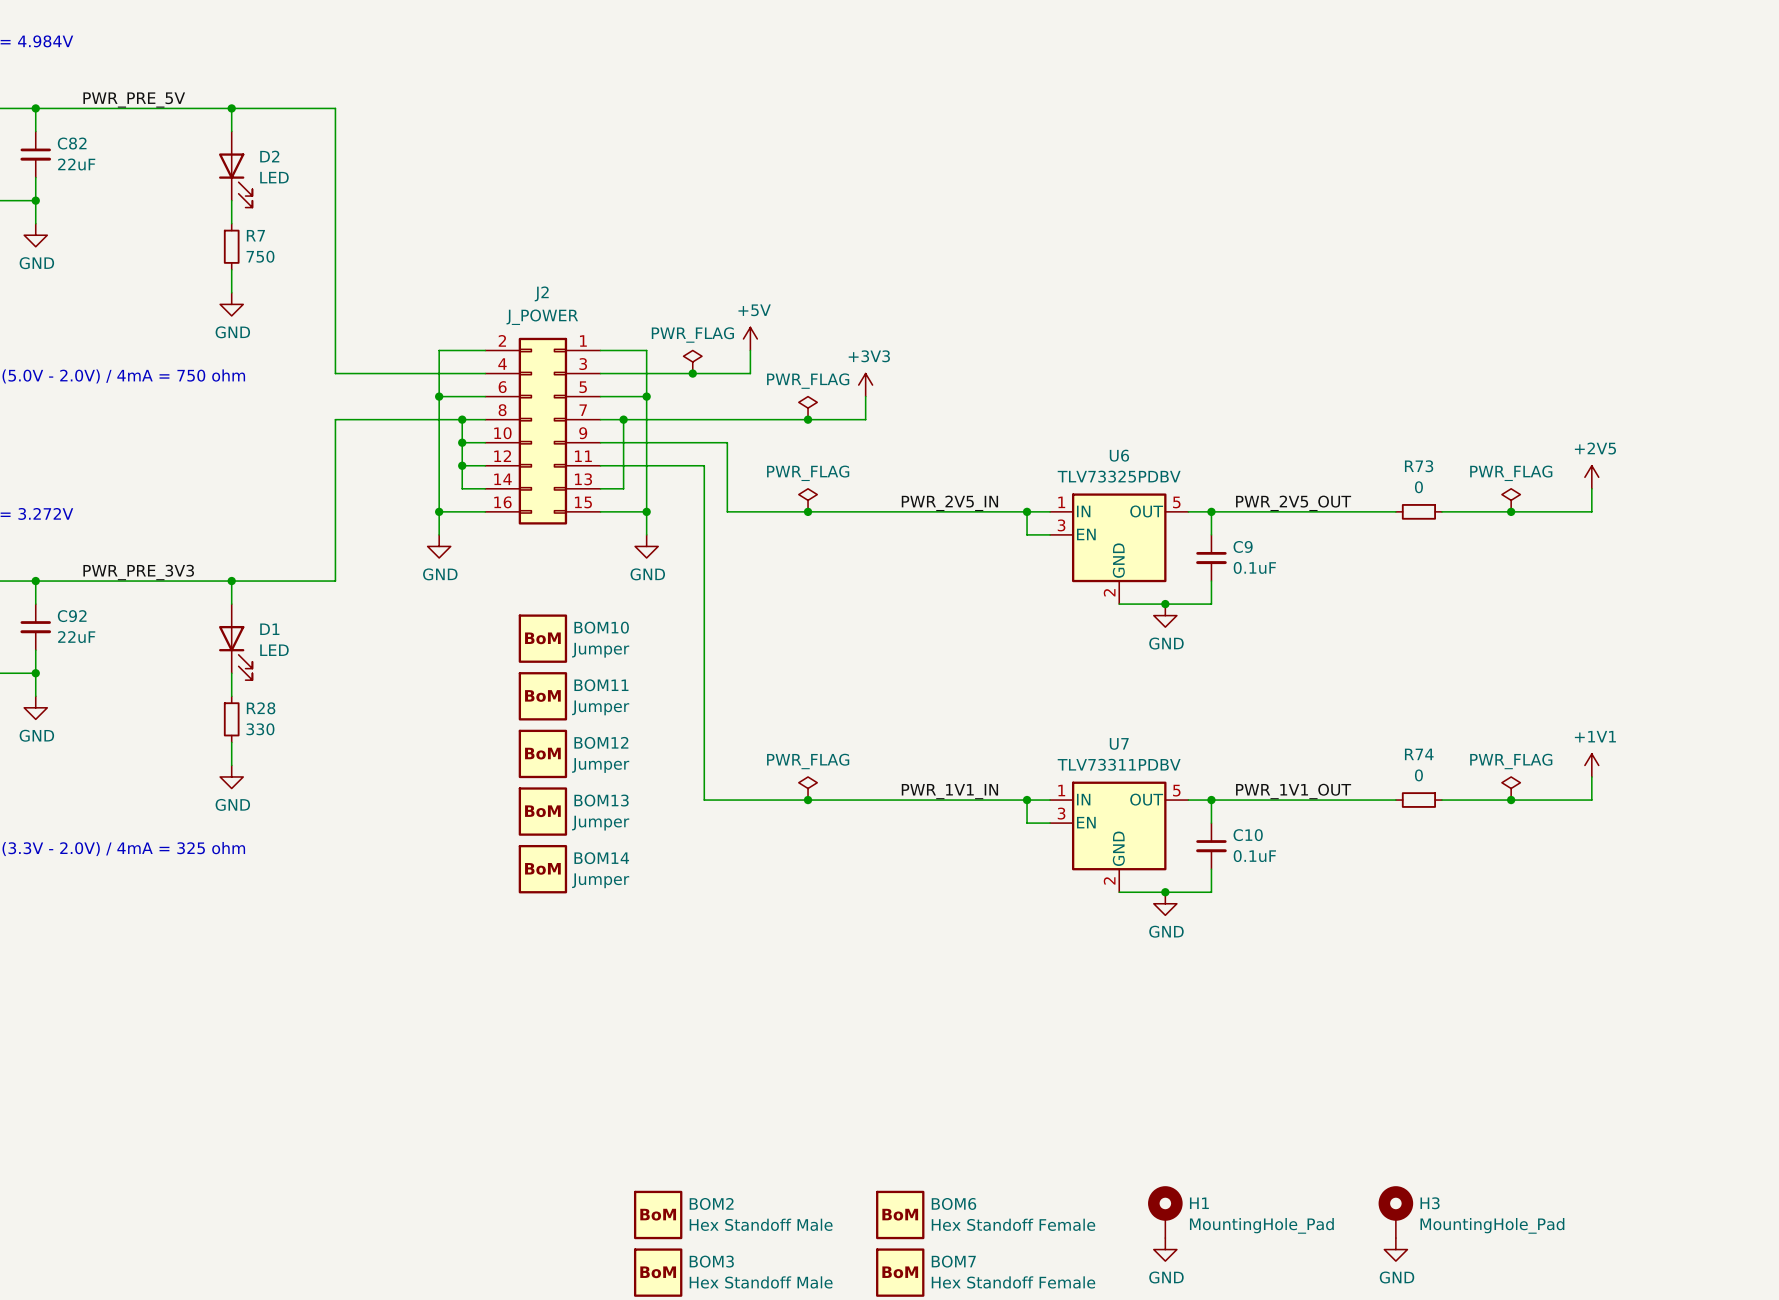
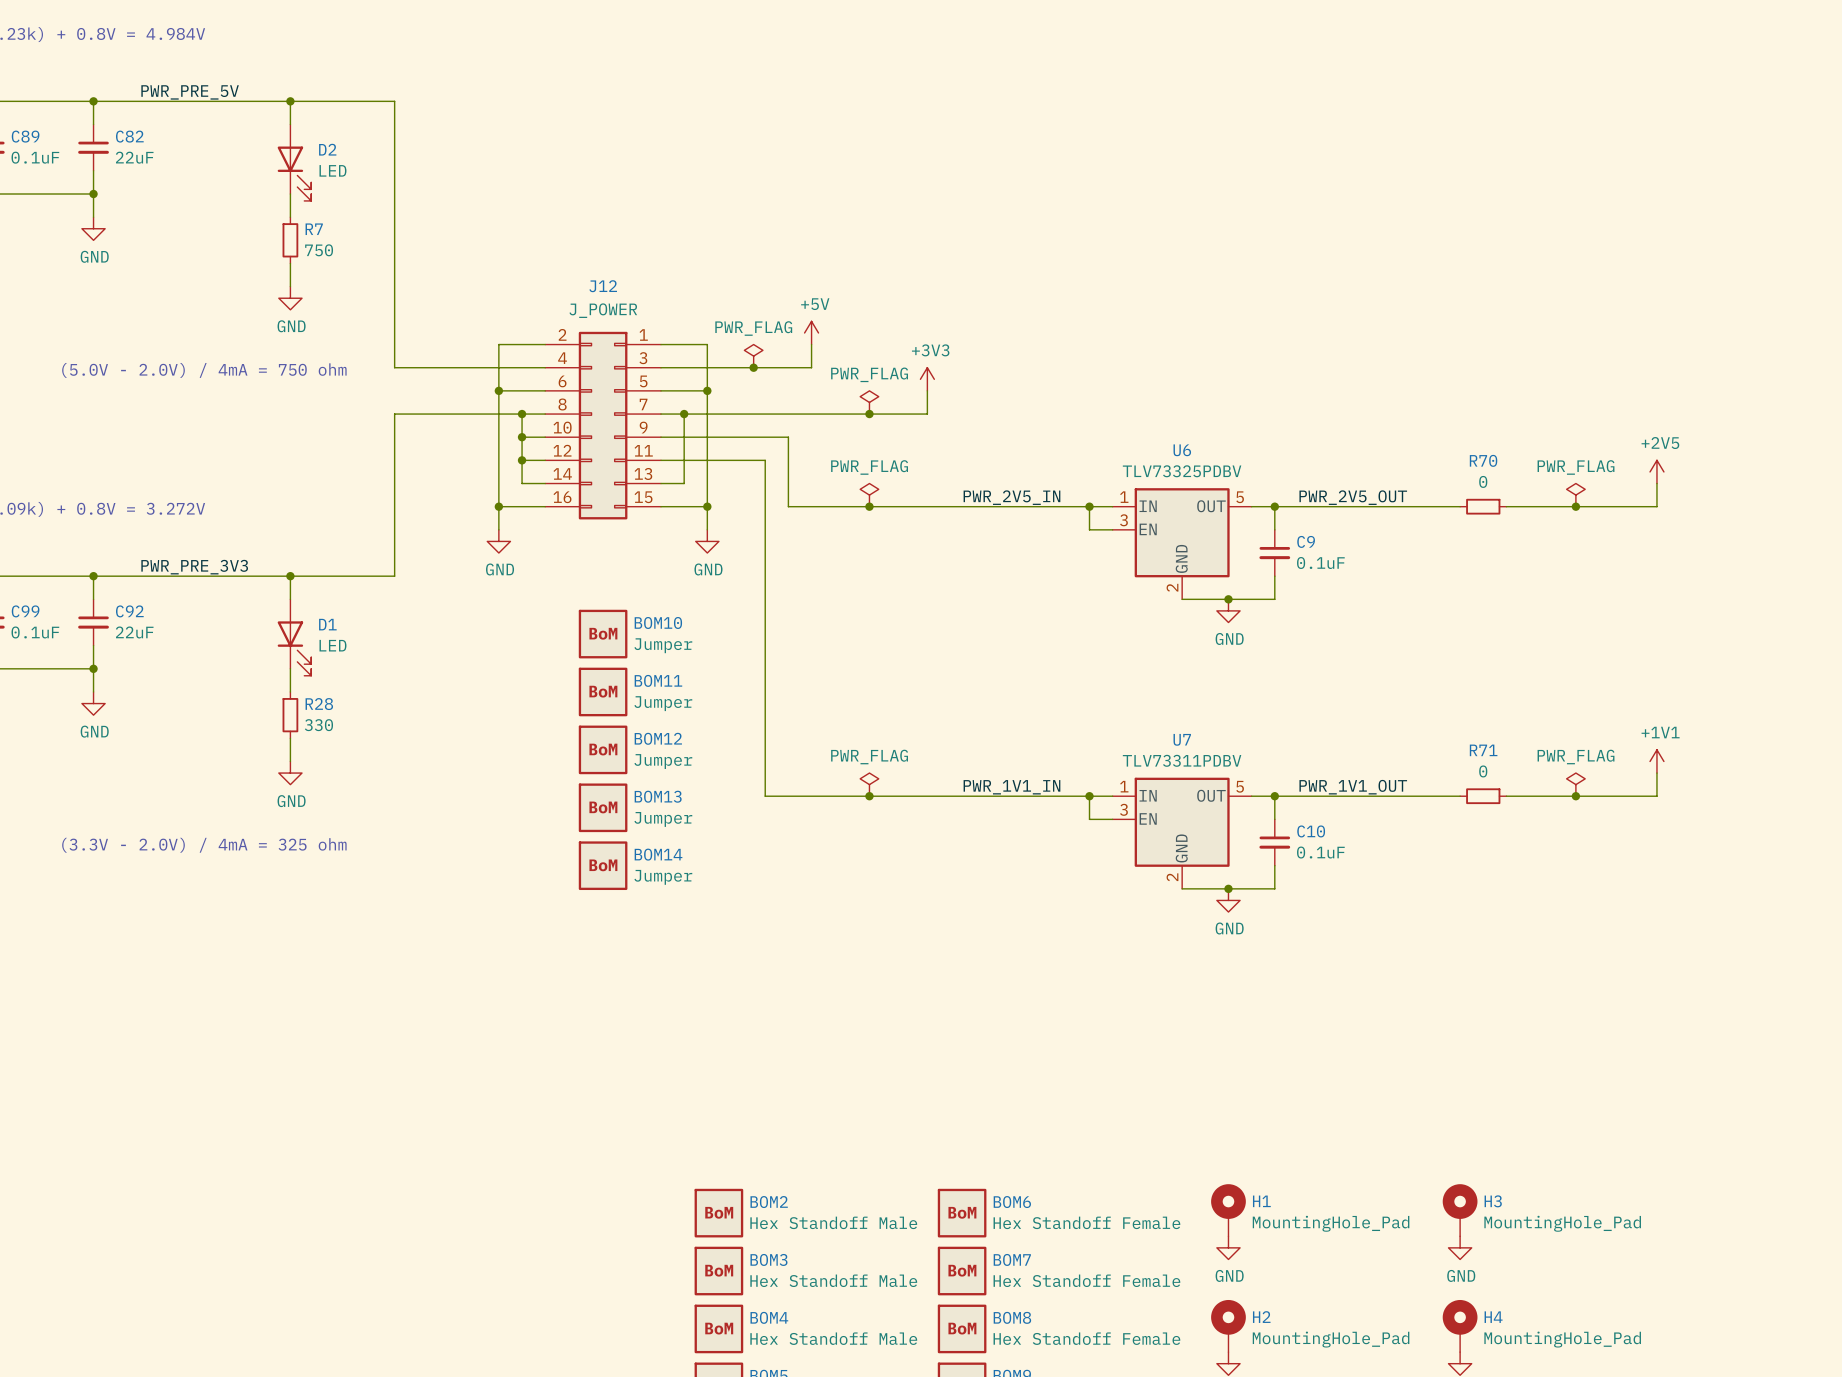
J2 name: J2 (541, 293) -> J12 (603, 286)
R73 name: R73 (1419, 466) -> R70 (1483, 460)
R74 name: R74 (1419, 754) -> R71 (1483, 750)

